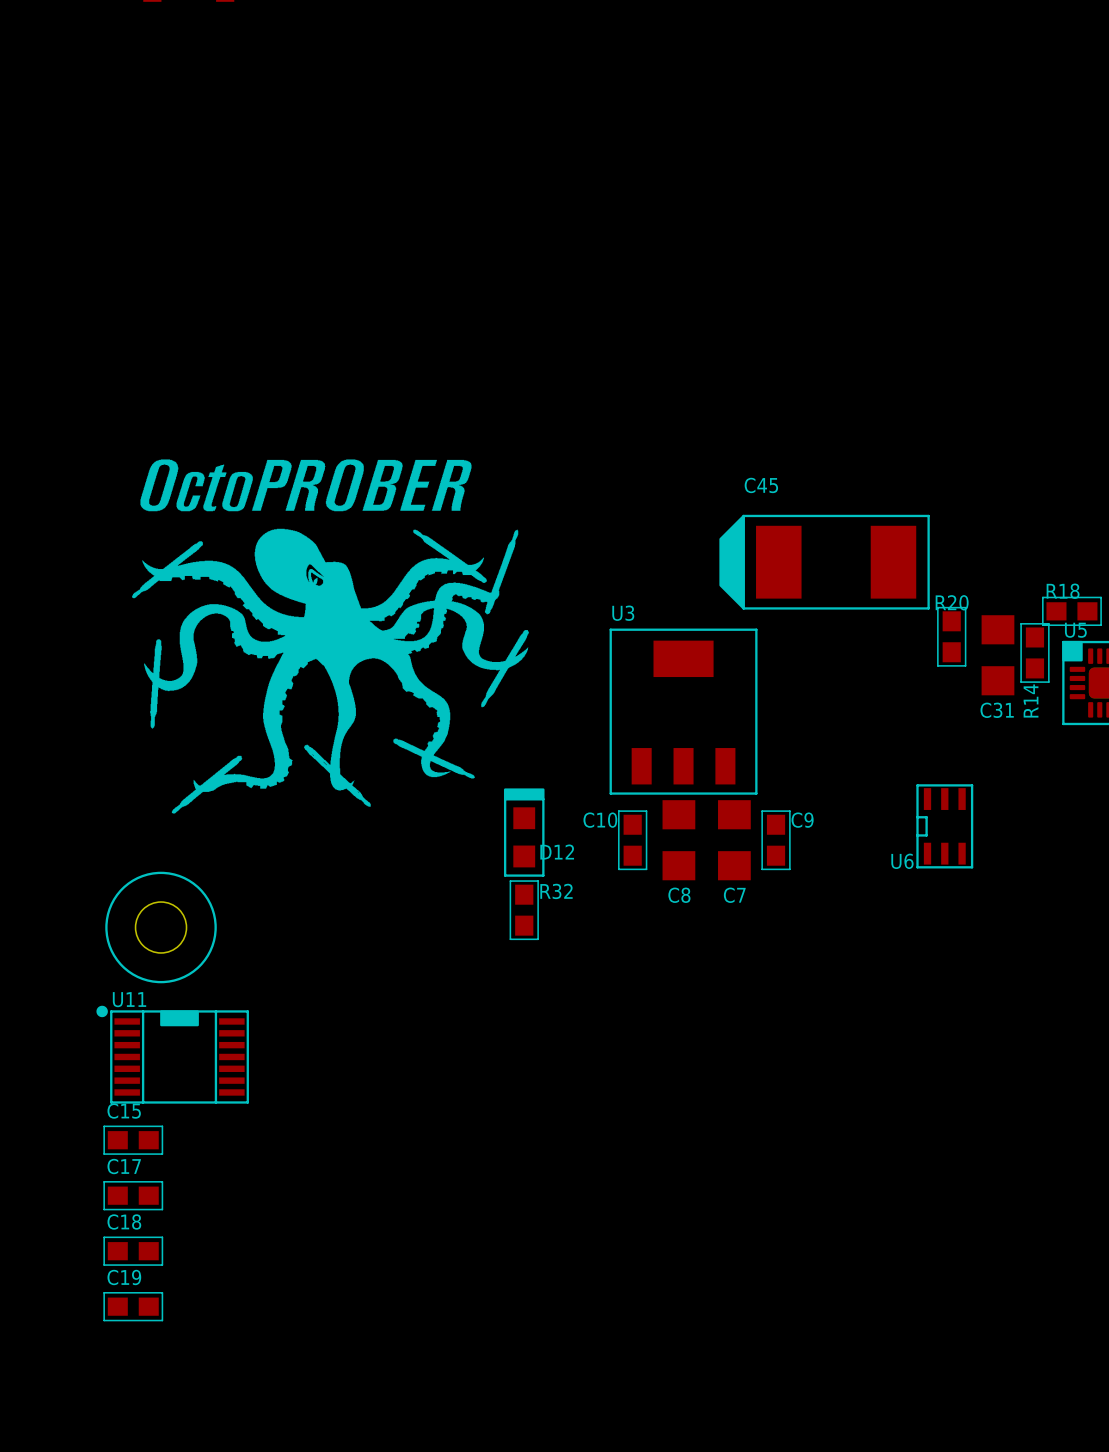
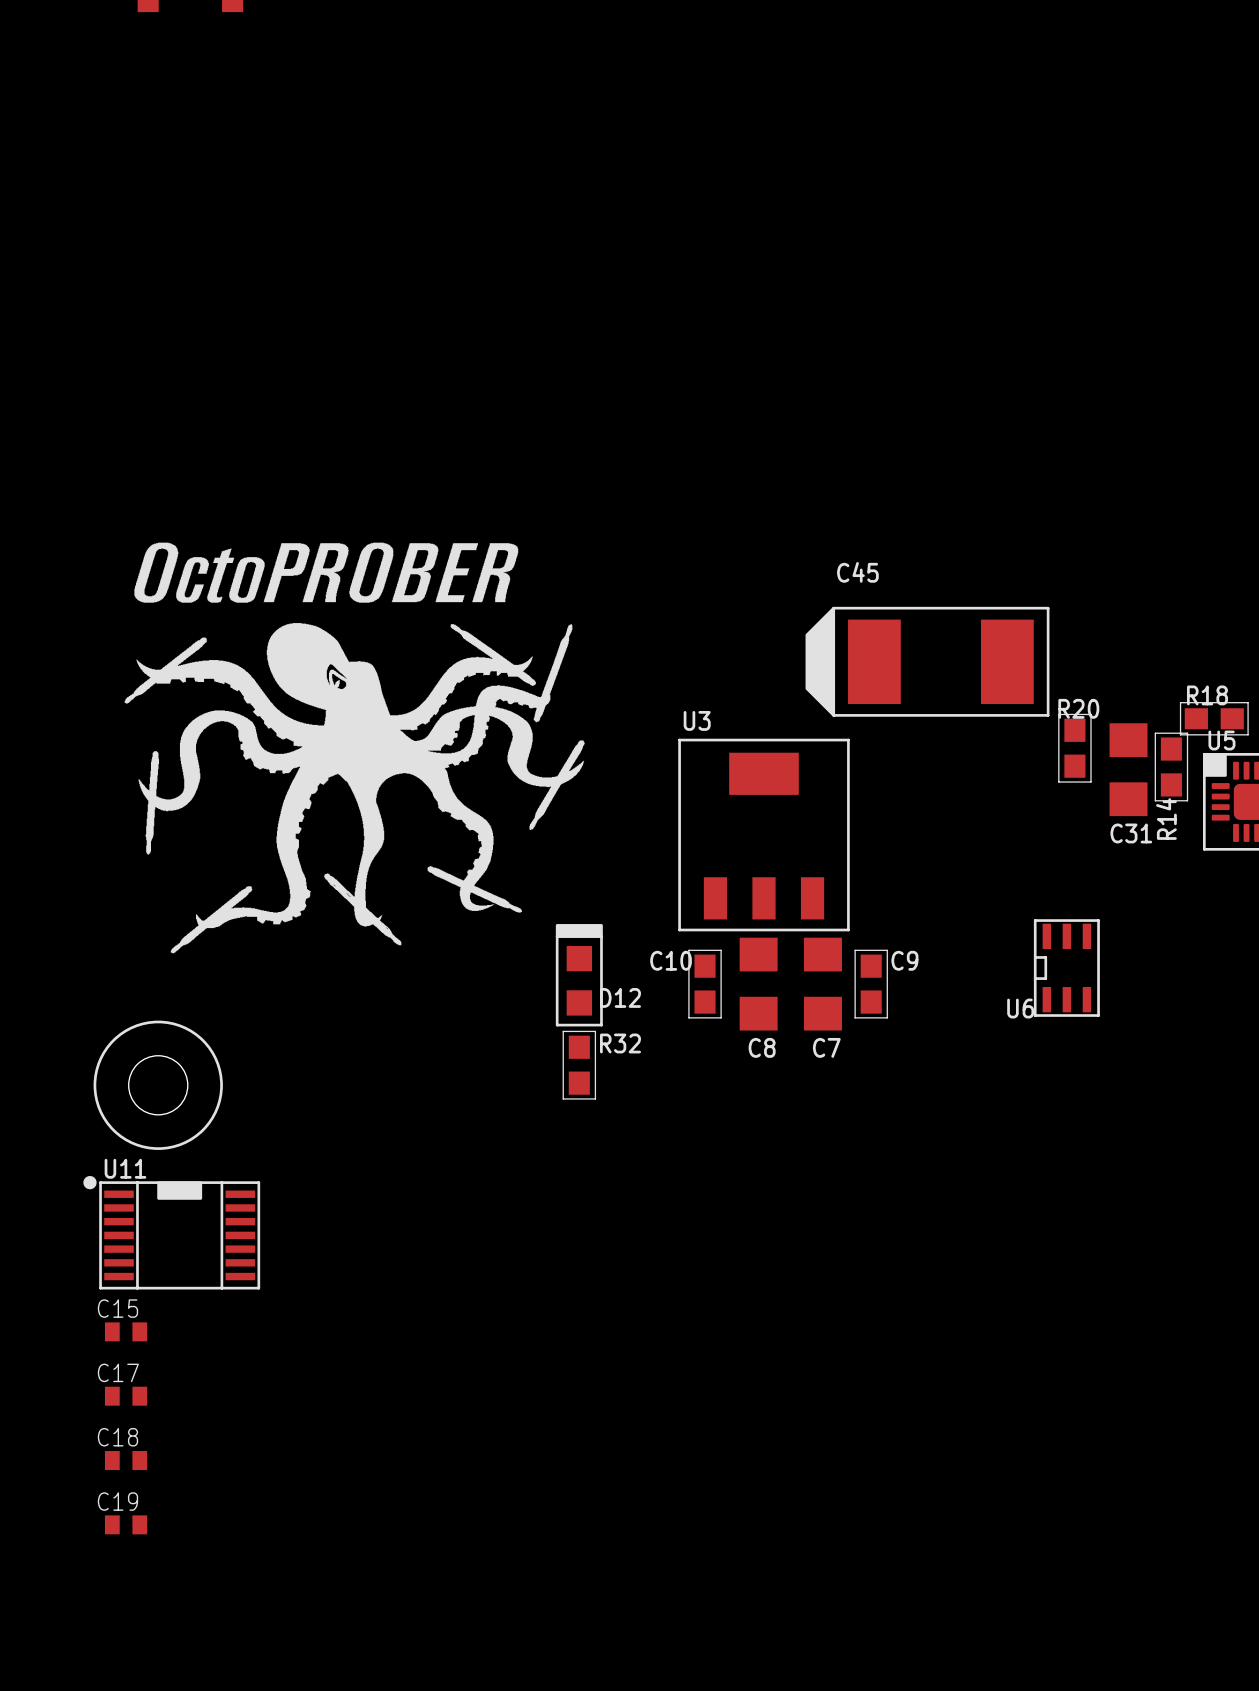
C15 footprint: [103, 1125, 163, 1155] -> [104, 1322, 148, 1342]
C17 footprint: [103, 1181, 163, 1211] -> [104, 1386, 148, 1406]
C18 footprint: [103, 1236, 163, 1266] -> [104, 1451, 148, 1471]
C19 footprint: [103, 1292, 163, 1322] -> [104, 1515, 148, 1535]

